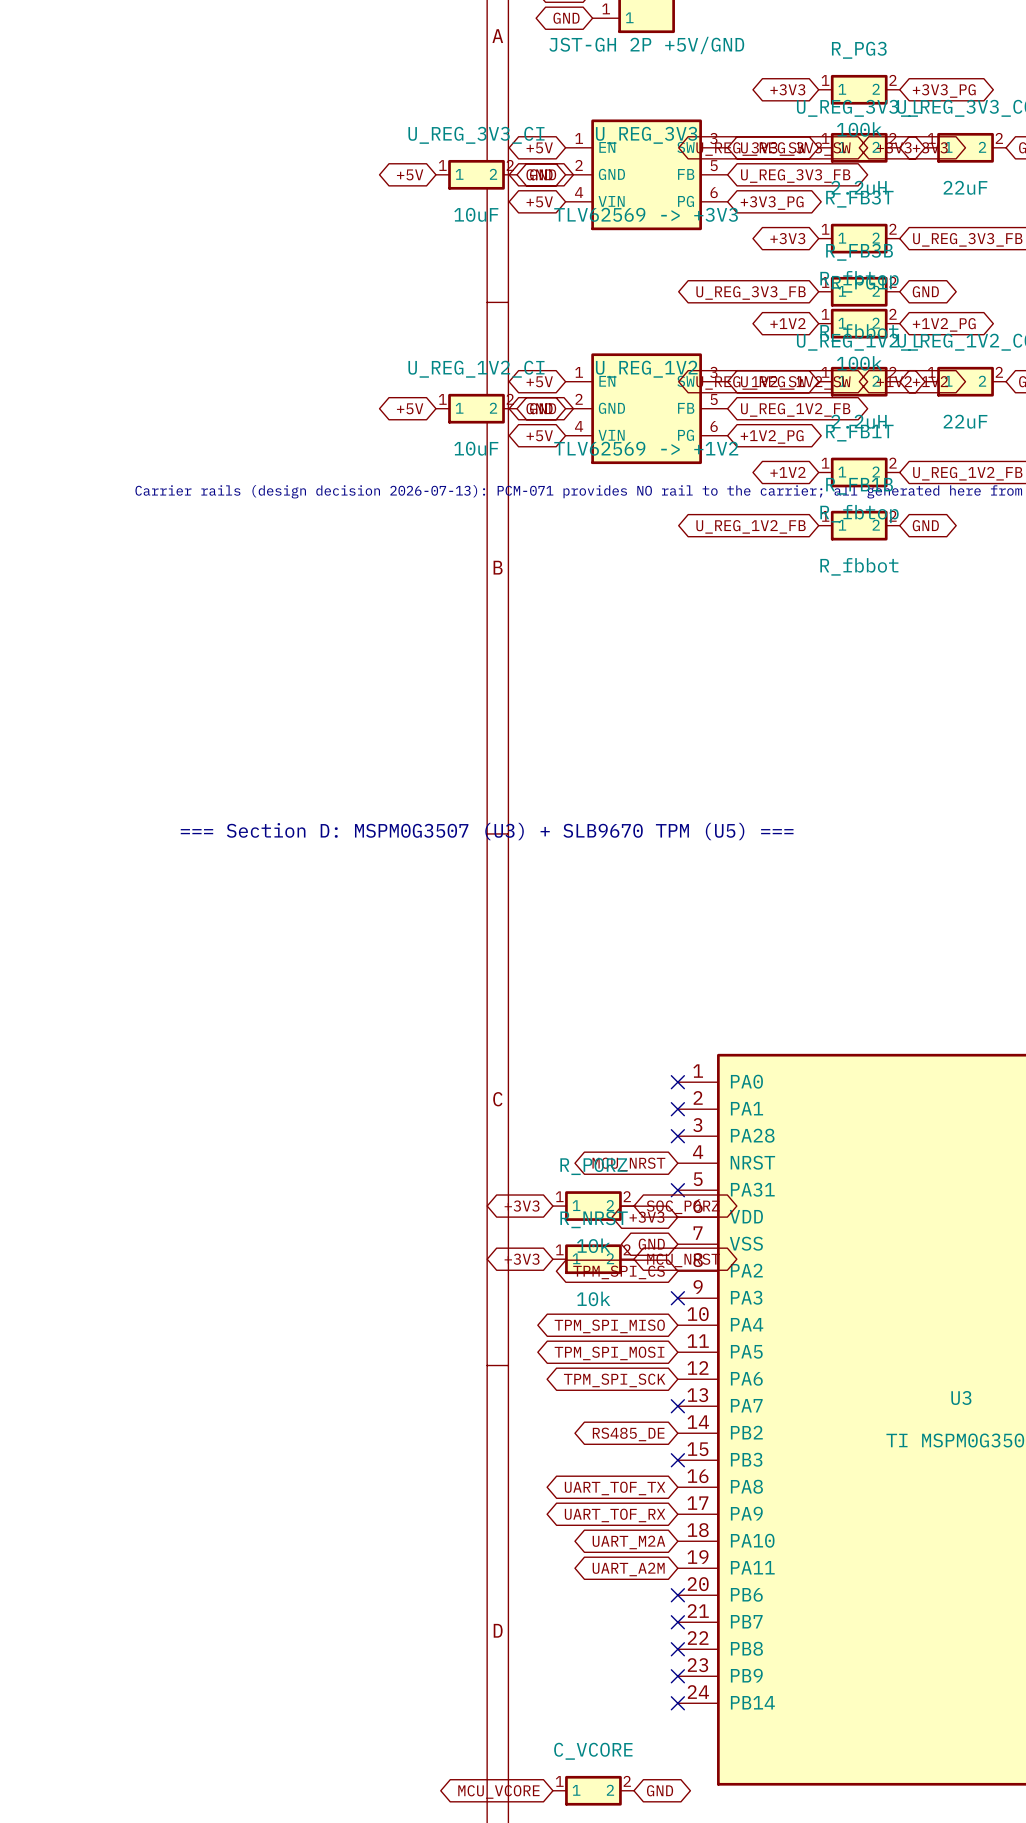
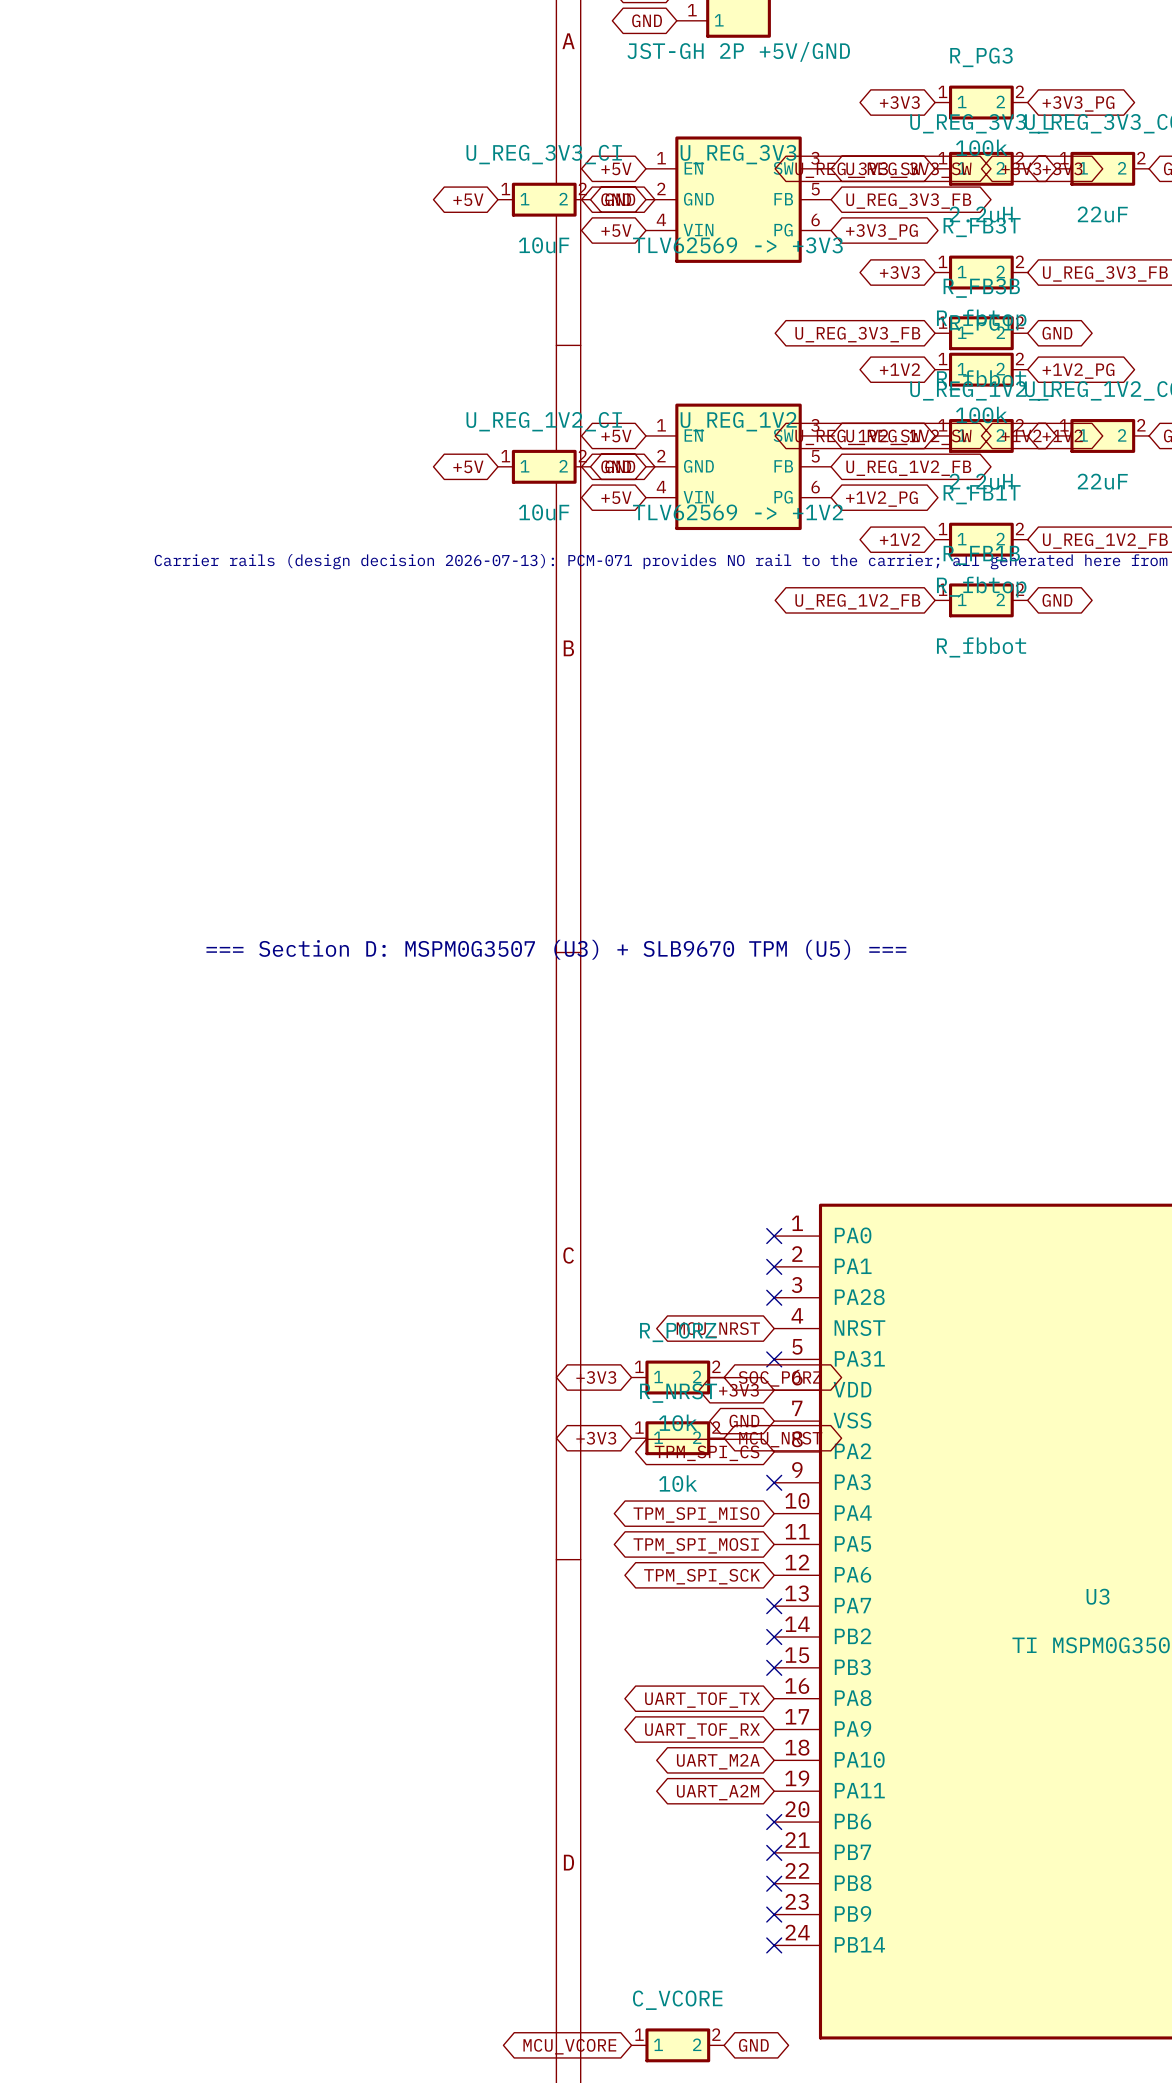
no-connect mark: none -> (774, 1636)
global label: RS485_DE (628, 1434) -> none

